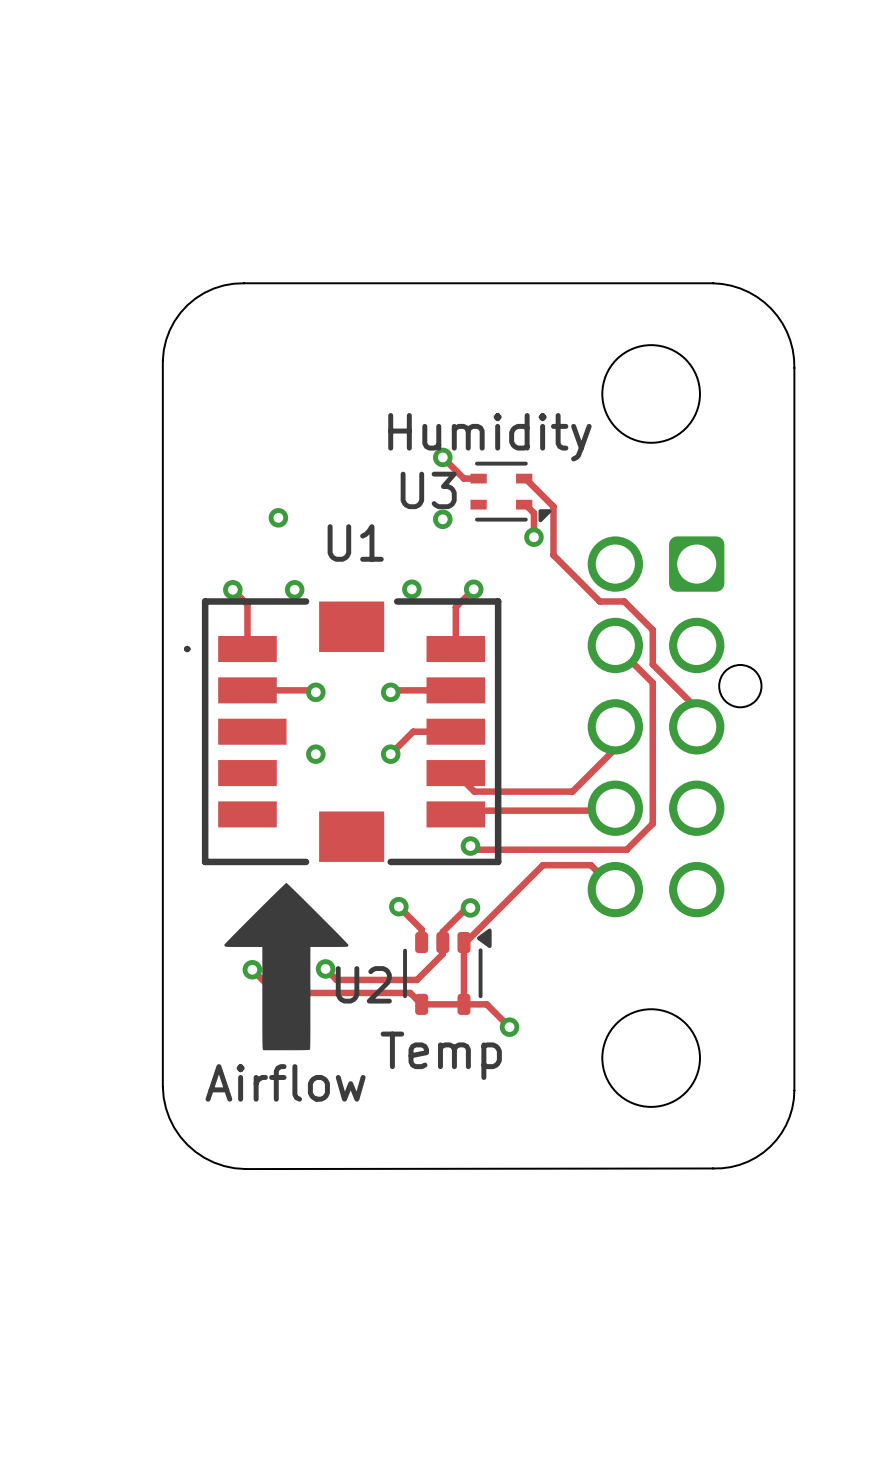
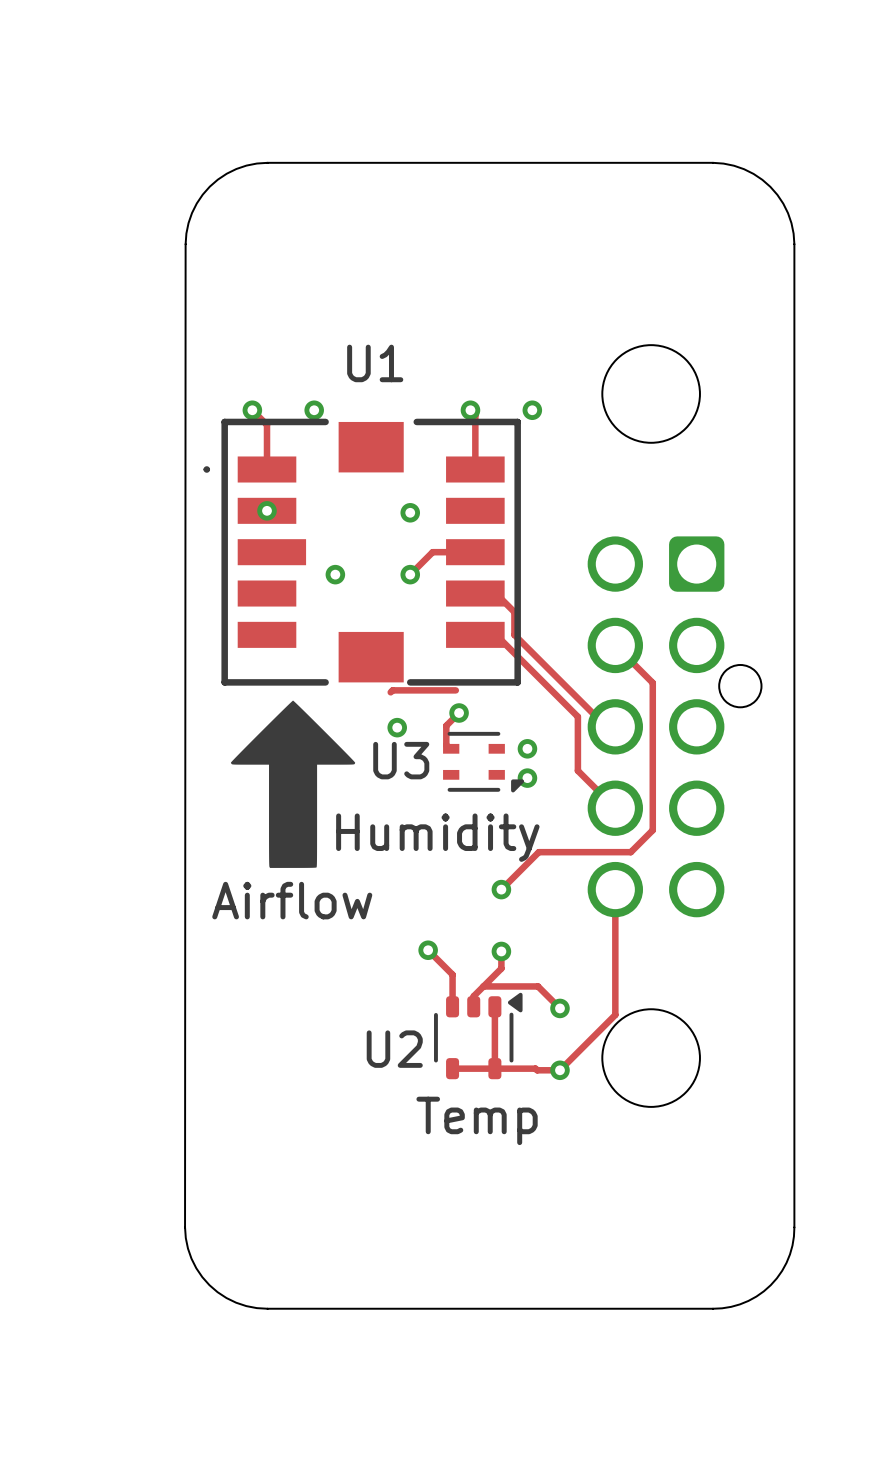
board edge: (794, 367) (792, 349) (786, 331) (771, 308) (748, 292) (731, 285) (713, 283) (233, 283) (204, 292) (180, 312) (166, 340) (162, 360) (162, 1086) (169, 1118) (180, 1136) (195, 1151) (213, 1162) (245, 1169) (721, 1168) (747, 1161) (770, 1146) (786, 1125) (792, 1108) (794, 1090) -> (794, 367) (794, 244) (791, 223) (783, 203) (770, 186) (753, 173) (734, 165) (713, 162) (267, 162) (246, 165) (226, 173) (202, 194) (188, 223) (185, 244) (185, 1227) (187, 1248) (196, 1268) (217, 1292) (236, 1302) (256, 1308) (713, 1308) (731, 1306) (756, 1296) (770, 1285) (782, 1270) (790, 1254) (794, 1227) (794, 1090)
via: none -> (252, 410)
via: none -> (314, 410)
track: none -> (470, 410) (475, 415) (475, 469)
via: none -> (470, 410)
via: none -> (532, 410)
text position: Humidity (489, 437) -> Humidity (437, 837)
track: (442, 457) (463, 478) (478, 478) -> none
via: (442, 457) -> none
track: (524, 478) (553, 506) (553, 555) (599, 601) (624, 601) (652, 629) (652, 664) (696, 708) (696, 726) -> none
U3 position: (511, 491) -> (483, 762)
track: (524, 504) (533, 513) (533, 537) -> none
via: none -> (410, 512)
via position: (278, 517) -> (267, 510)
via: (442, 519) -> none
via: (533, 537) -> none
via: none -> (335, 574)
track: (232, 589) (247, 604) (247, 649) -> (252, 410) (267, 424) (267, 469)
via: (232, 589) -> none
via: (294, 589) -> none
via position: (411, 589) -> (410, 574)
track: (473, 589) (455, 607) (455, 649) -> none
via: (473, 589) -> none
track: (247, 690) (313, 690) (315, 692) -> none
via: (315, 692) -> none
via: (390, 692) -> none
track: none -> (459, 713) (446, 725) (446, 745) (451, 748)
via: none -> (459, 713)
track: (615, 726) (615, 748) (572, 791) (474, 791) (455, 773) -> (615, 726) (606, 726) (514, 634) (514, 612) (495, 593) (475, 593)
via: none -> (397, 727)
U1 position: (342, 731) -> (362, 552)
track: (455, 731) (413, 731) (390, 754) -> (475, 552) (432, 552) (410, 574)
via: none -> (527, 748)
via: (315, 754) -> none
via: (390, 754) -> none
via: none -> (527, 778)
track: (615, 808) (612, 810) (459, 810) (455, 814) -> (615, 808) (577, 770) (577, 716) (496, 634) (475, 634)
track: (652, 823) (626, 849) (474, 849) (470, 846) -> (652, 823) (652, 830) (630, 852) (538, 852) (501, 889)
via: (470, 846) -> none
via: none -> (501, 889)
track: (615, 889) (590, 865) (542, 865) (463, 942) (463, 1004) -> (615, 889) (615, 1014) (559, 1070) (452, 1068)
track: (398, 906) (421, 929) (421, 942) -> none
via: (398, 906) -> none
track: (470, 907) (466, 907) (442, 931) (442, 954) (416, 979) (336, 979) (325, 968) -> none
via: (470, 907) -> none
track: none -> (428, 950) (452, 974) (452, 1006)
via: none -> (428, 950)
track: none -> (501, 951) (501, 968) (473, 996) (473, 1006)
via: none -> (501, 951)
drawing position: (286, 966) -> (293, 784)
via: (325, 968) -> none
track: (252, 969) (275, 992) (410, 992) (421, 1004) (486, 1004) (509, 1027) -> none
via: (252, 969) -> none
U2 position: (447, 971) -> (478, 1036)
track: none -> (483, 986) (538, 986) (559, 1008)
track: none -> (494, 1006) (494, 1068)
via: none -> (559, 1008)
via: (509, 1027) -> none
text position: Temp (441, 1055) -> Temp (477, 1120)
via: none -> (559, 1070)
text position: Airflow (285, 1082) -> Airflow (292, 900)

